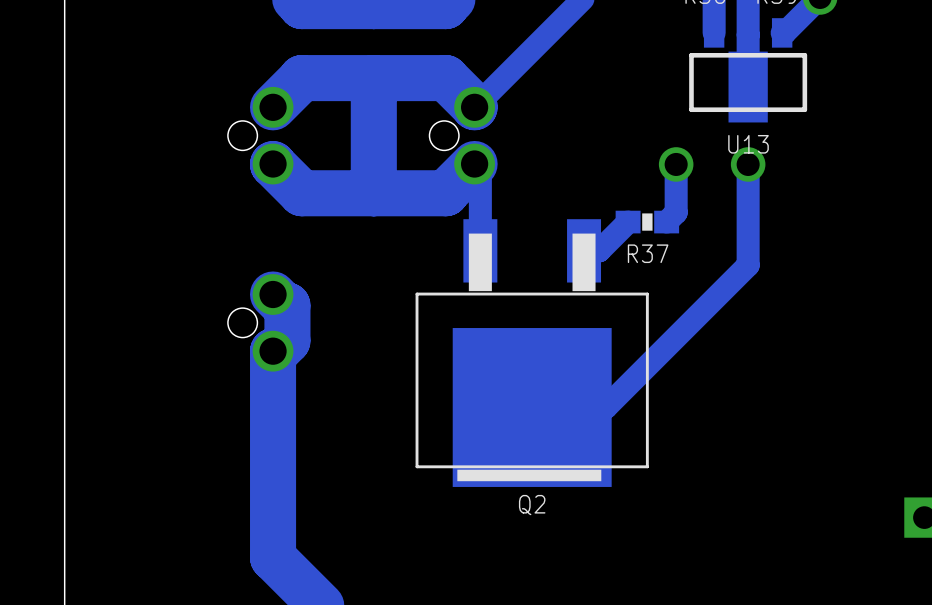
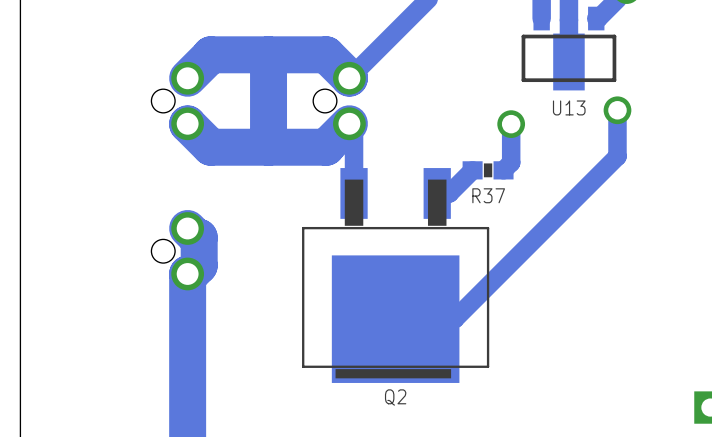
track: (748, 164) (748, 265) -> (617, 110) (617, 156) (568, 205)
via position: (748, 164) -> (617, 110)

